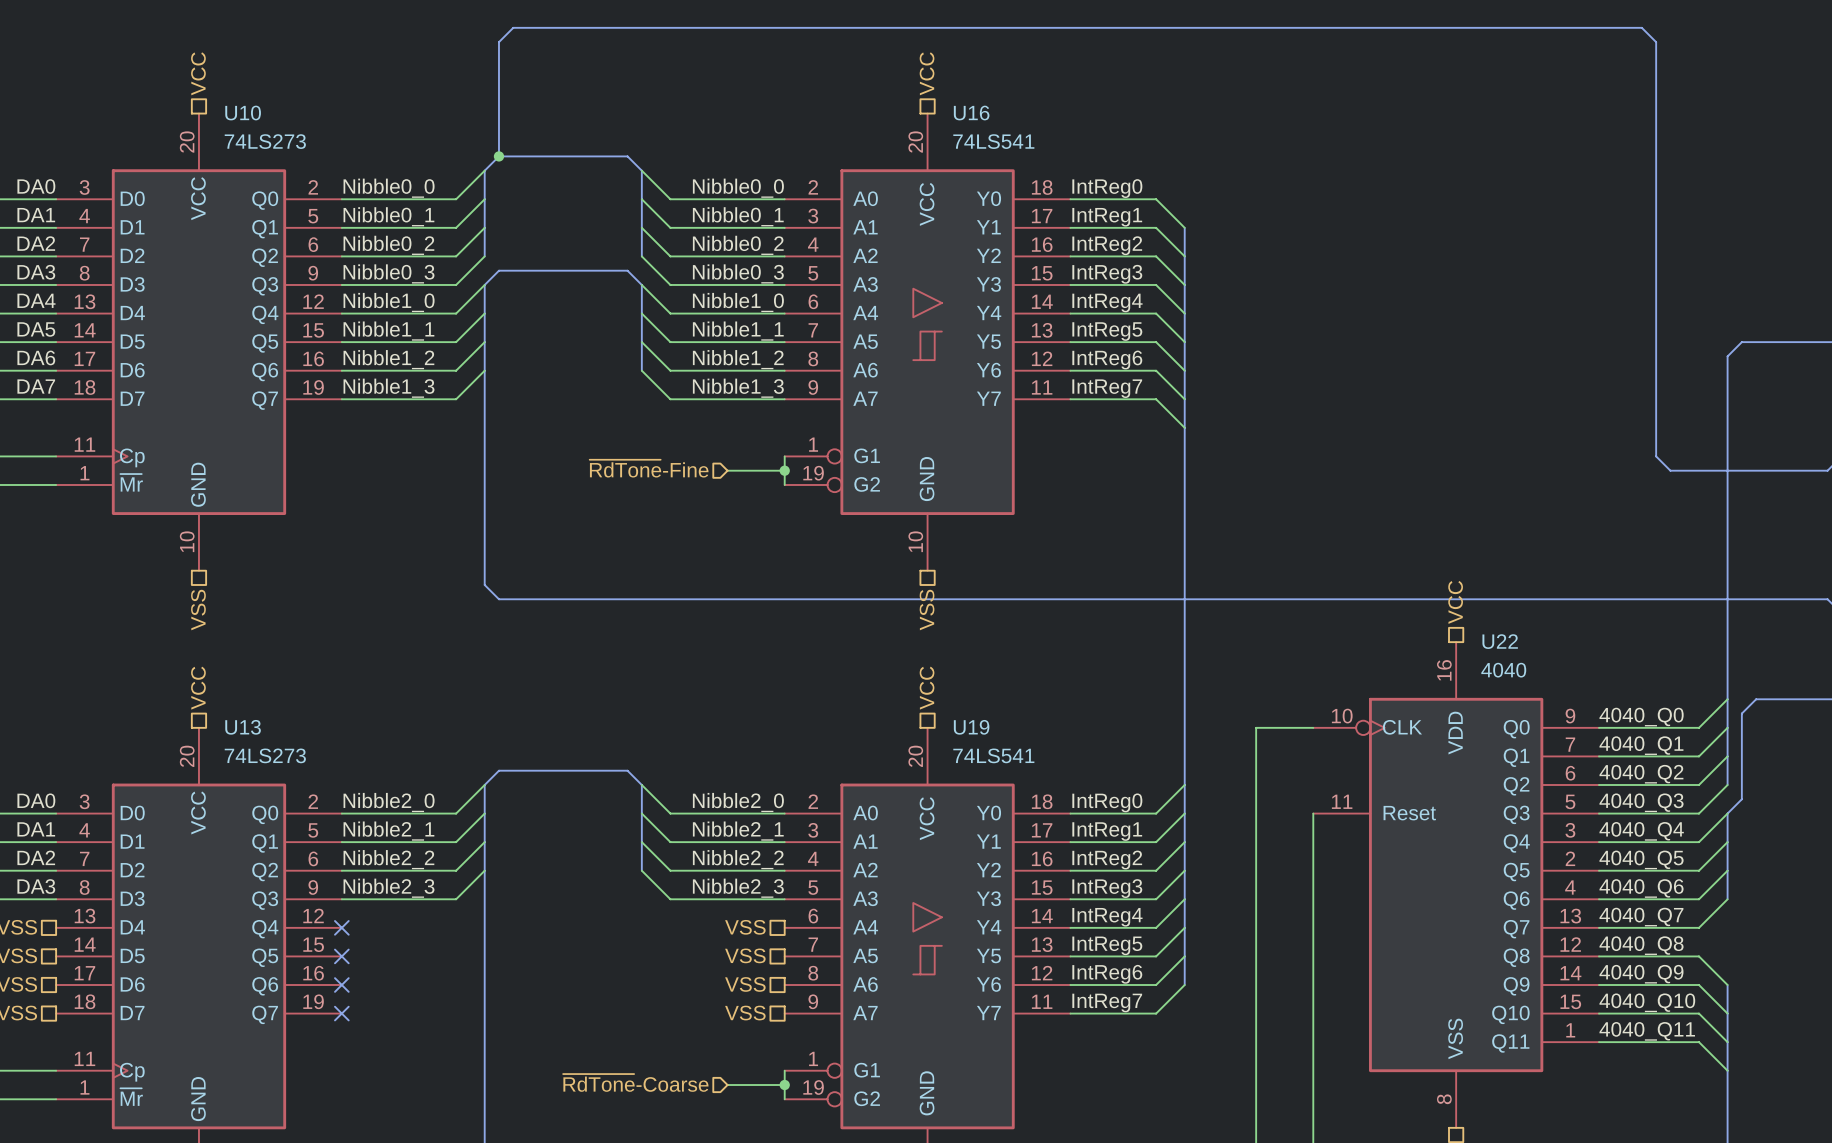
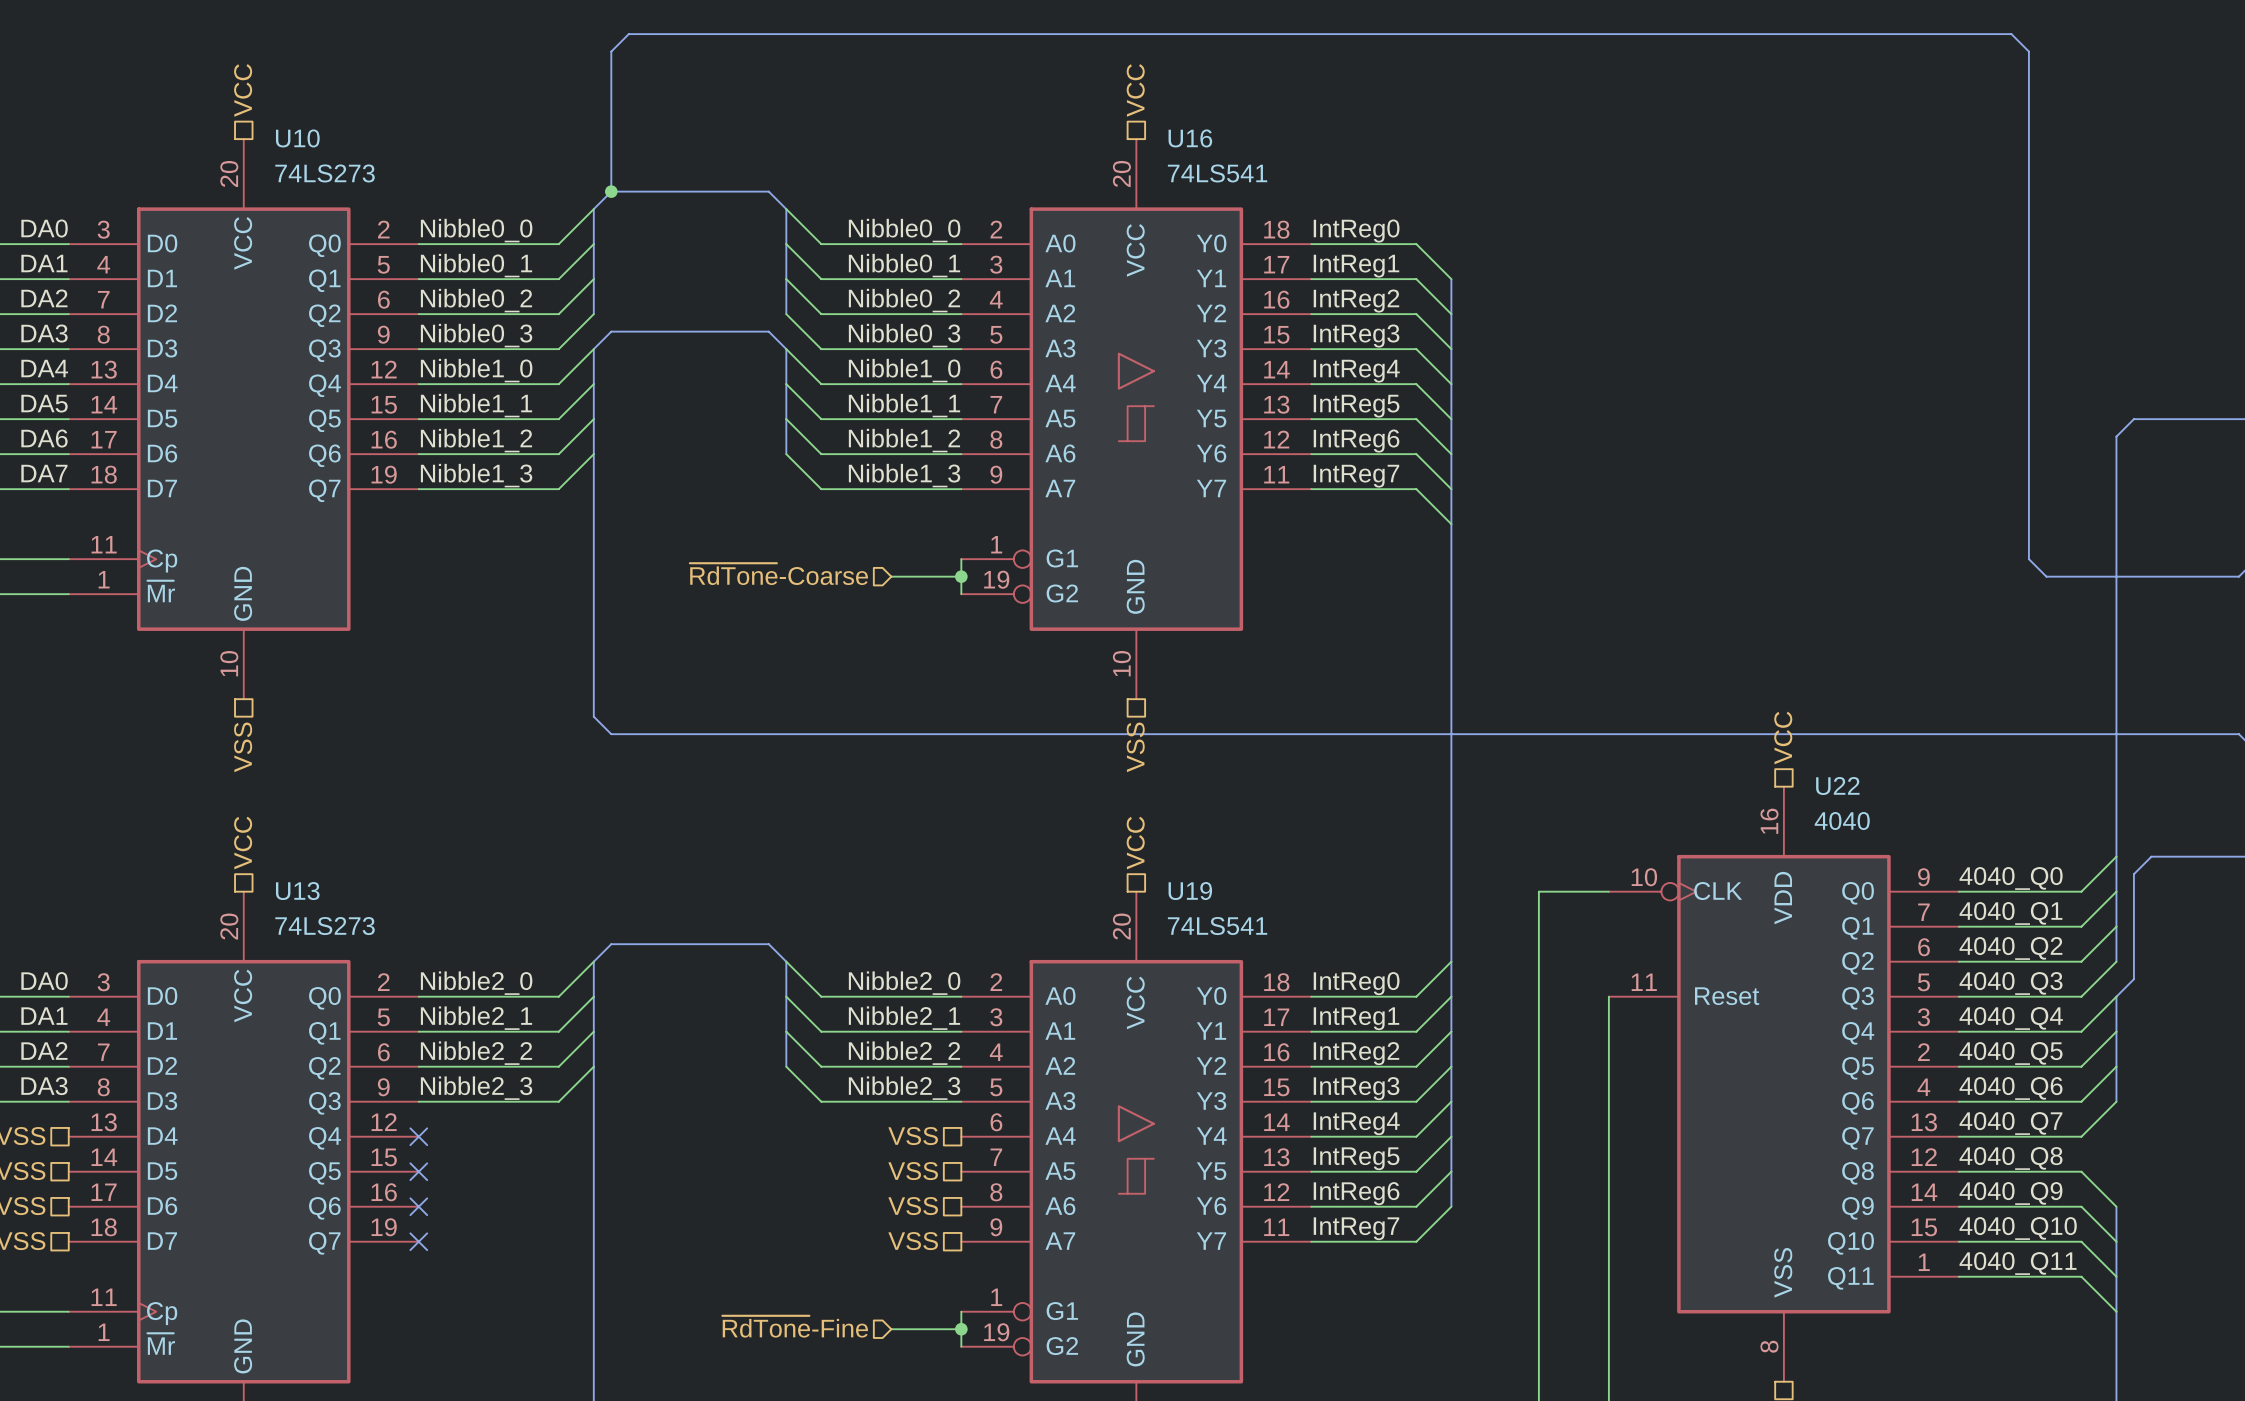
hierarchical label: ~{RdTone}-Fine (649, 468) -> ~{RdTone}-Coarse (778, 574)
hierarchical label: ~{RdTone}-Coarse (635, 1082) -> ~{RdTone}-Fine (795, 1326)

